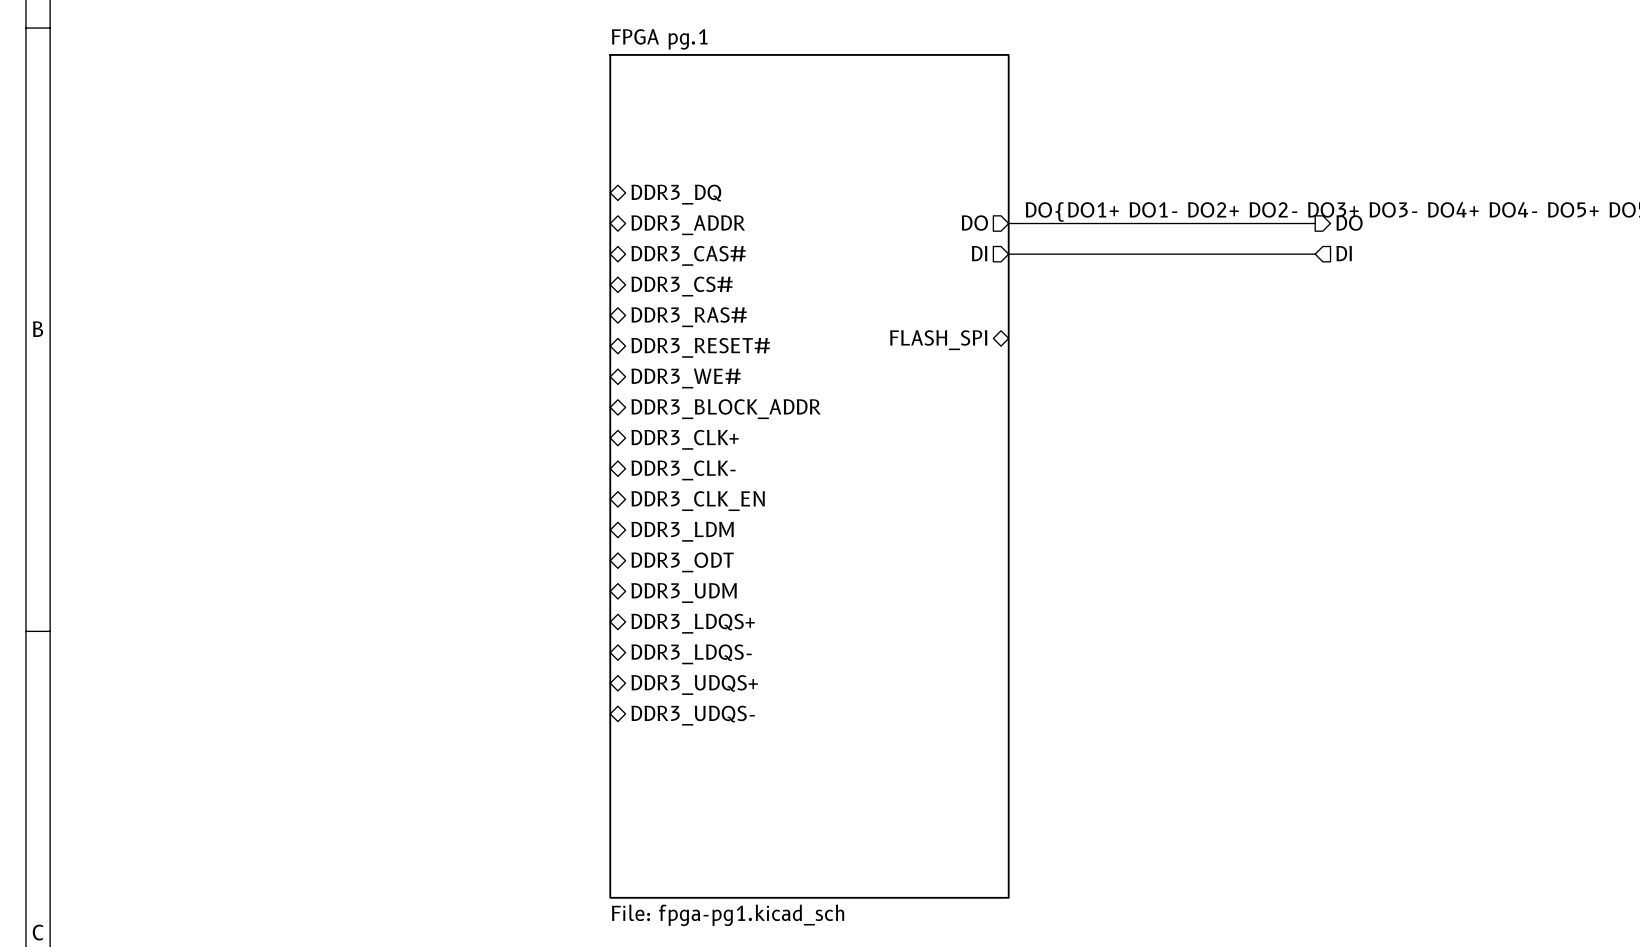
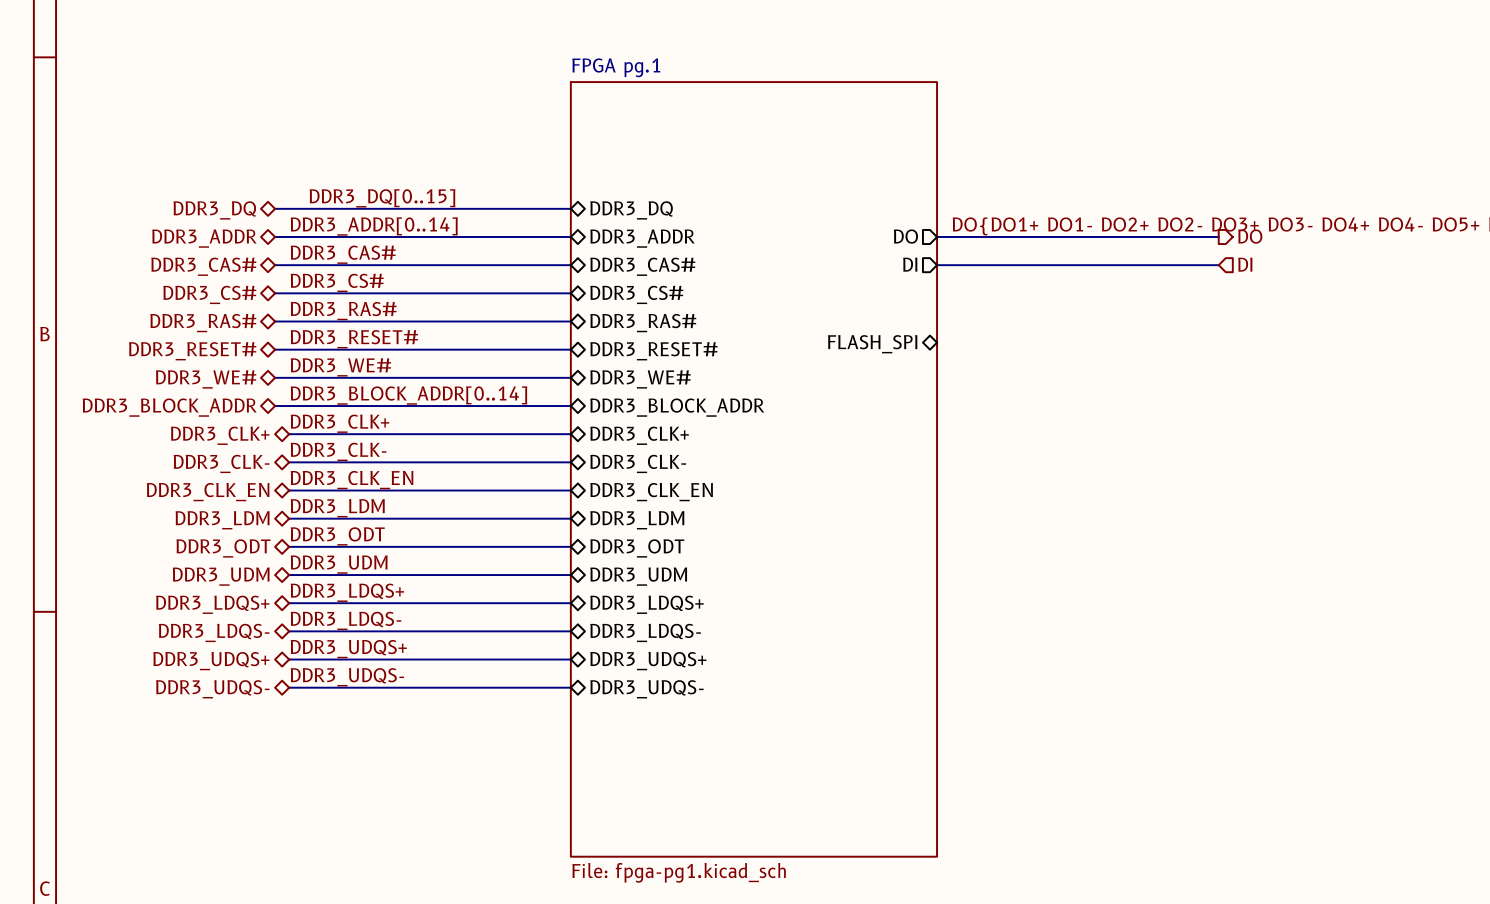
label: none -> DDR3_DQ[0..15] (382, 198)
bus: none -> (275, 208) (570, 208)
hierarchical label: none -> DDR3_DQ (214, 210)
label: none -> DDR3_ADDR[0..14] (374, 226)
bus: none -> (275, 237) (570, 237)
hierarchical label: none -> DDR3_ADDR (204, 238)
label: none -> DDR3_CAS# (343, 254)
wire: none -> (275, 265) (570, 265)
hierarchical label: none -> DDR3_CAS# (203, 266)
label: none -> DDR3_CS# (337, 282)
wire: none -> (275, 293) (570, 293)
hierarchical label: none -> DDR3_CS# (209, 294)
label: none -> DDR3_RAS# (343, 311)
wire: none -> (275, 321) (570, 321)
hierarchical label: none -> DDR3_RAS# (203, 323)
label: none -> DDR3_RESET# (354, 339)
wire: none -> (275, 349) (570, 349)
hierarchical label: none -> DDR3_RESET# (192, 351)
label: none -> DDR3_WE# (340, 367)
wire: none -> (275, 377) (570, 377)
hierarchical label: none -> DDR3_WE# (206, 379)
label: none -> DDR3_BLOCK_ADDR[0..14] (409, 395)
bus: none -> (275, 406) (570, 406)
hierarchical label: none -> DDR3_BLOCK_ADDR (169, 407)
label: none -> DDR3_CLK+ (339, 423)
wire: none -> (289, 434) (570, 434)
hierarchical label: none -> DDR3_CLK+ (220, 435)
label: none -> DDR3_CLK- (338, 451)
wire: none -> (289, 462) (570, 462)
hierarchical label: none -> DDR3_CLK- (221, 463)
label: none -> DDR3_CLK_EN (352, 480)
wire: none -> (289, 490) (570, 490)
hierarchical label: none -> DDR3_CLK_EN (208, 492)
label: none -> DDR3_LDM (337, 508)
wire: none -> (289, 518) (570, 518)
hierarchical label: none -> DDR3_LDM (222, 520)
label: none -> DDR3_ODT (337, 536)
wire: none -> (289, 546) (570, 546)
hierarchical label: none -> DDR3_ODT (223, 548)
label: none -> DDR3_UDM (339, 564)
wire: none -> (289, 575) (570, 575)
hierarchical label: none -> DDR3_UDM (221, 576)
label: none -> DDR3_LDQS+ (347, 592)
wire: none -> (289, 603) (570, 603)
hierarchical label: none -> DDR3_LDQS+ (212, 604)
label: none -> DDR3_LDQS- (346, 620)
wire: none -> (289, 631) (570, 631)
hierarchical label: none -> DDR3_LDQS- (214, 632)
label: none -> DDR3_UDQS+ (348, 649)
wire: none -> (289, 659) (570, 659)
hierarchical label: none -> DDR3_UDQS+ (211, 661)
label: none -> DDR3_UDQS- (347, 677)
wire: none -> (289, 687) (570, 687)
hierarchical label: none -> DDR3_UDQS- (212, 689)

